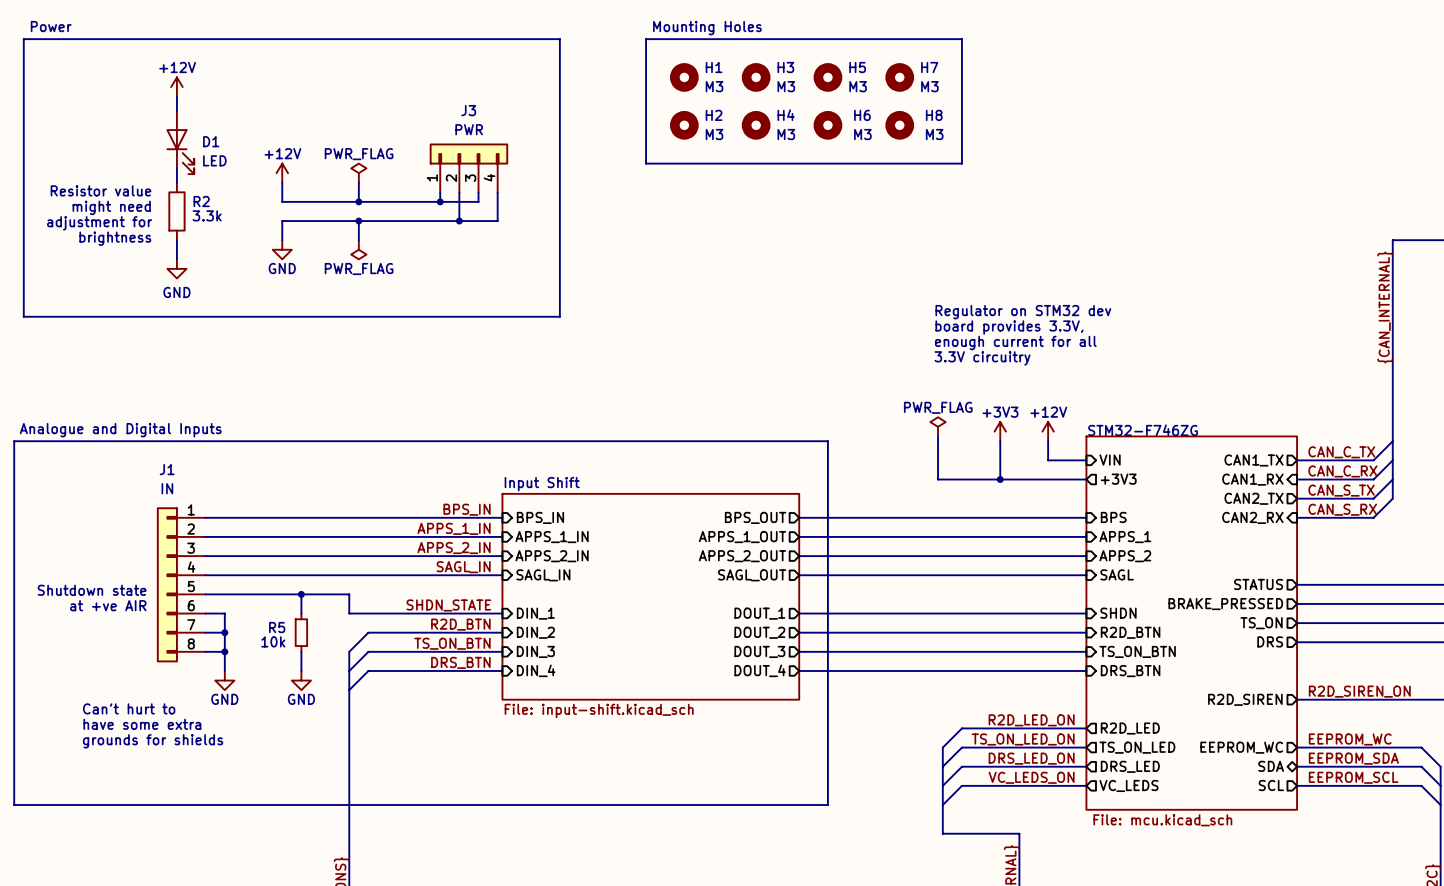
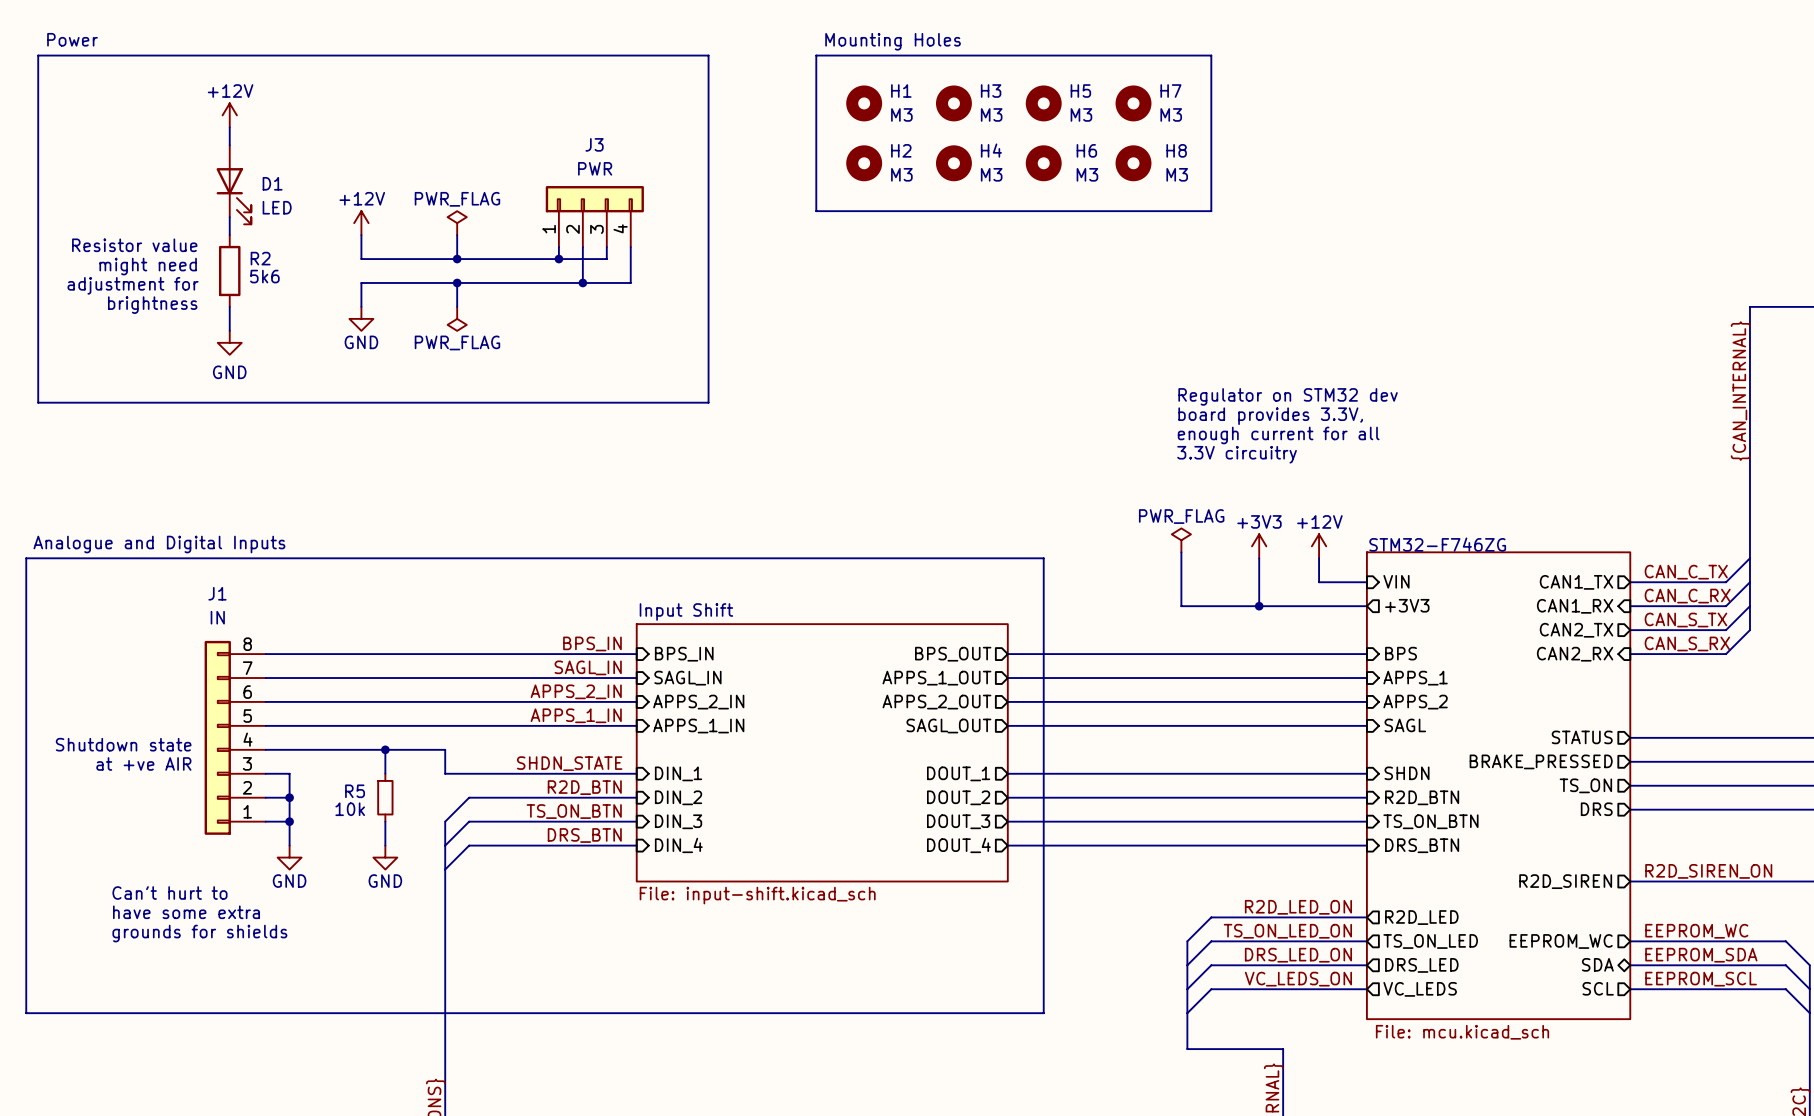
R2 value: 3.3k (207, 215) -> 5k6 (264, 276)
label: APPS_1_IN (454, 528) -> SAGL_IN (588, 667)
sheet pin: APPS_1_IN (552, 537) -> SAGL_IN (687, 678)
label: SAGL_IN (463, 567) -> APPS_1_IN (576, 715)
sheet pin: SAGL_IN (543, 575) -> APPS_1_IN (698, 726)
J1 flip: as is (167, 584) -> up-down (217, 737)

